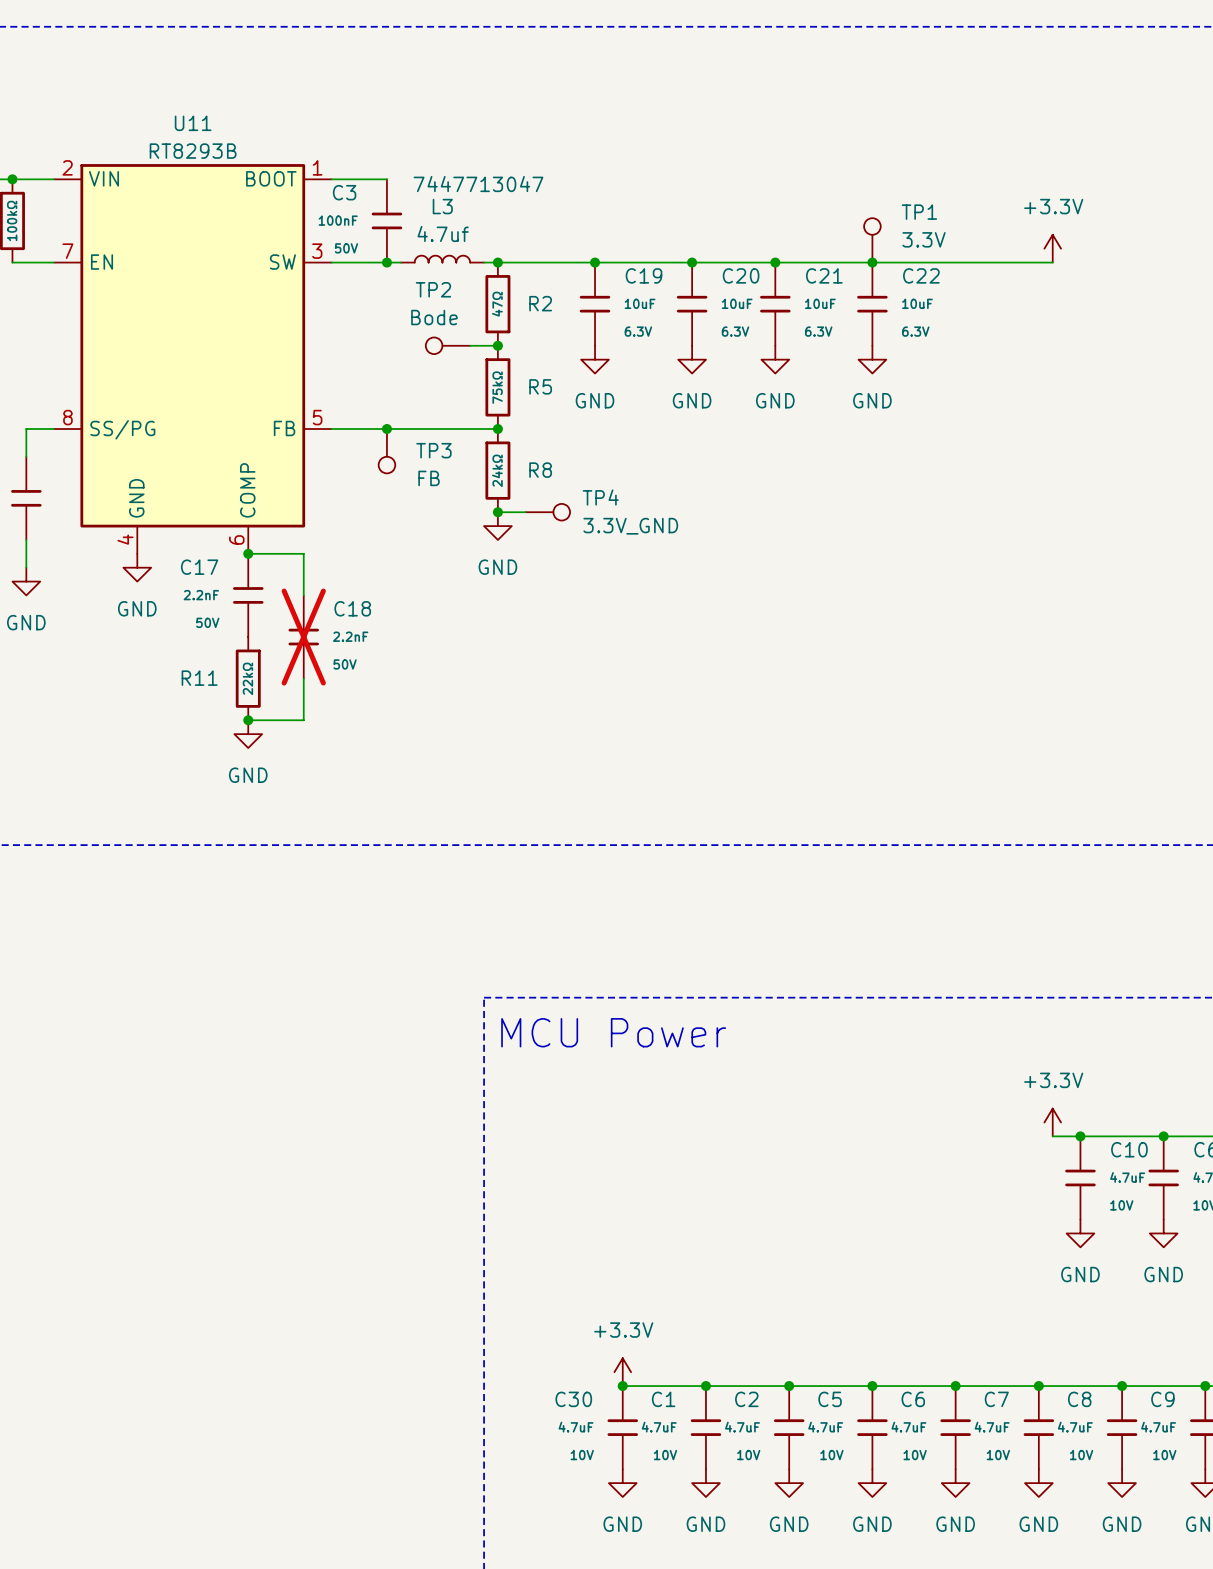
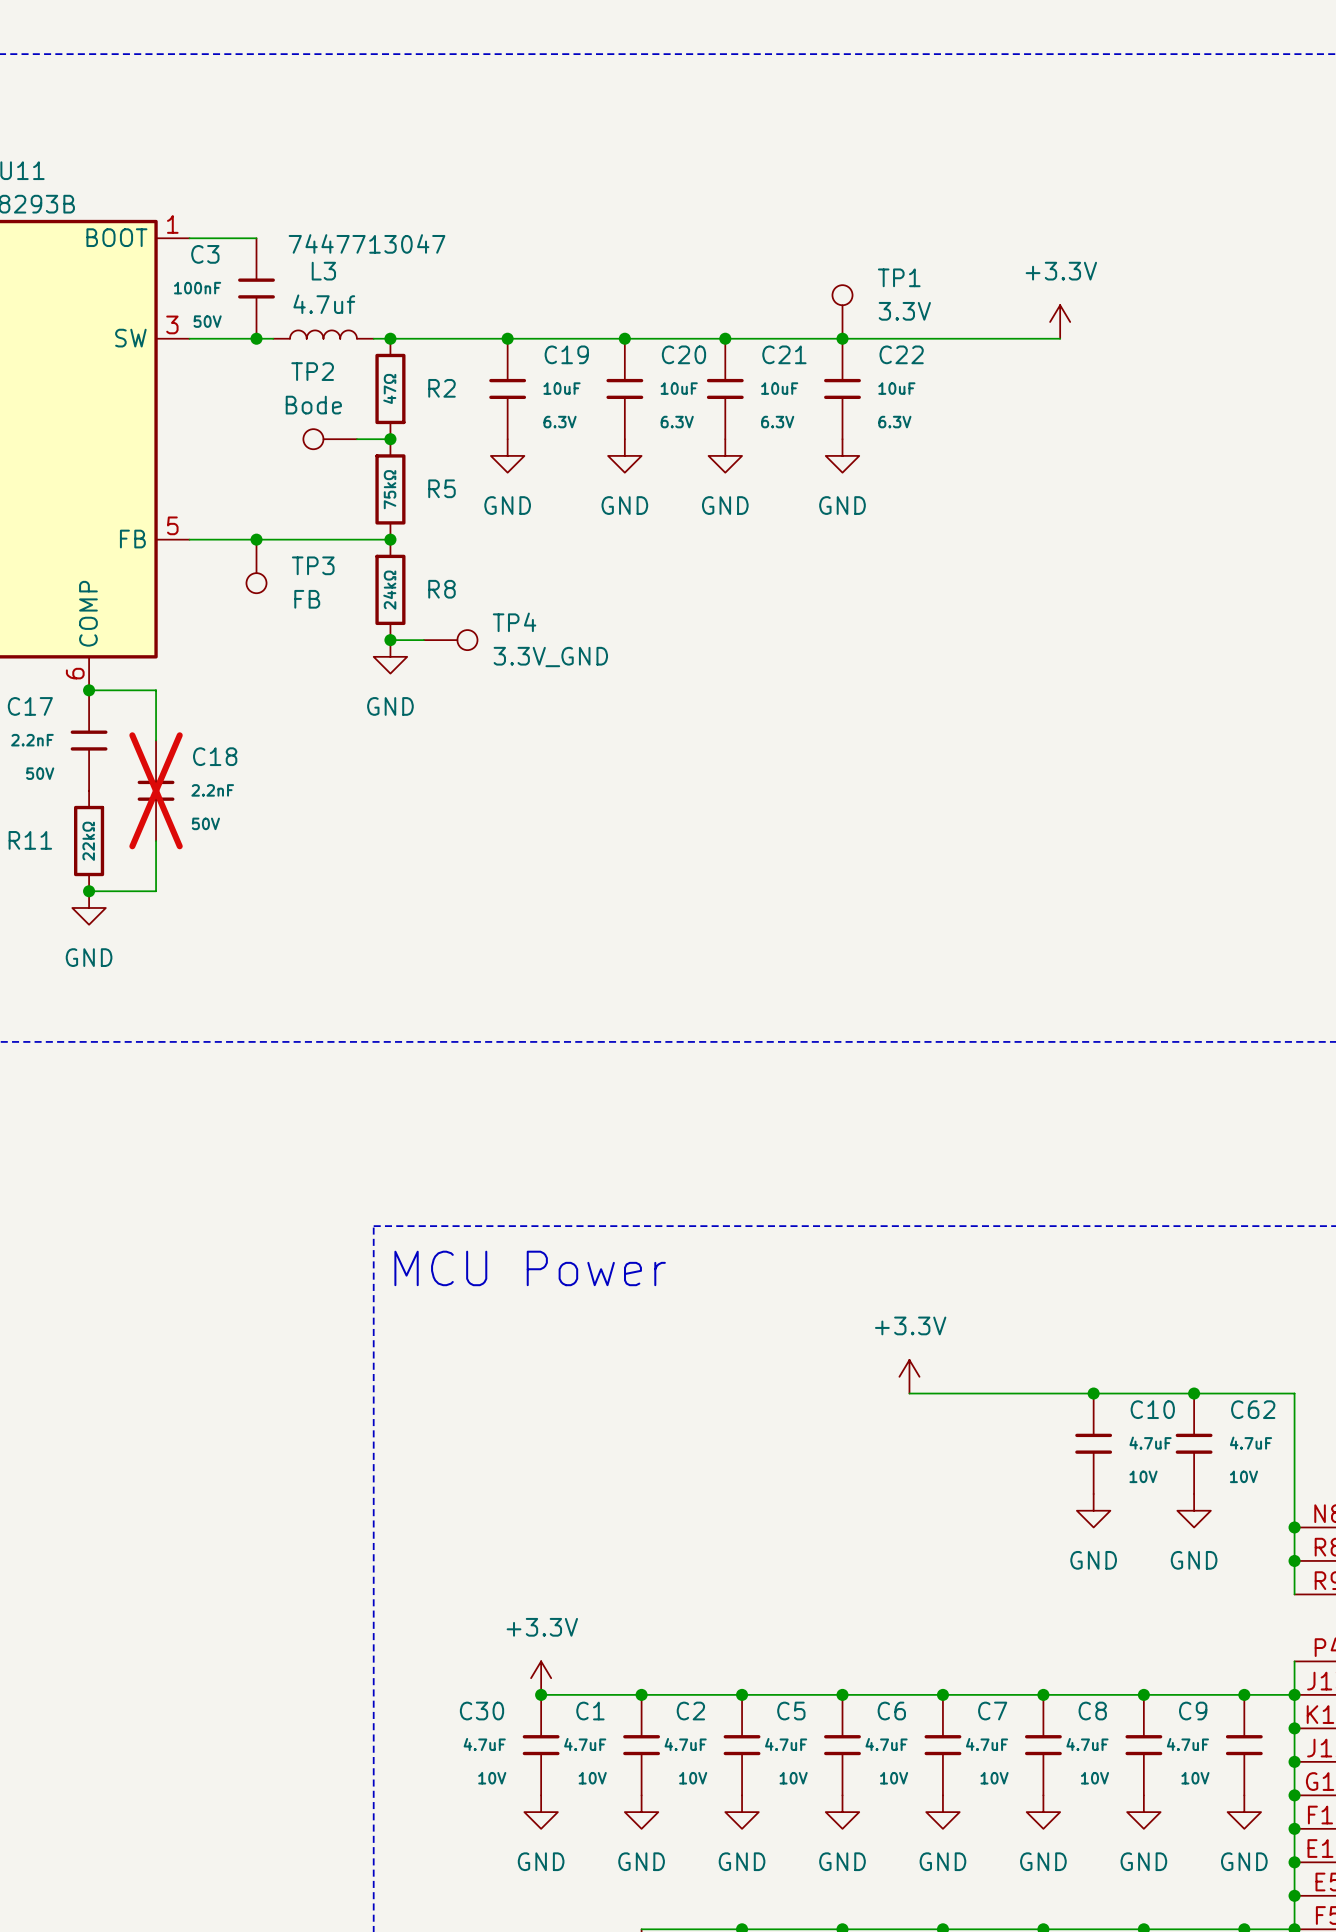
power symbol position: +3.3V (1052, 1122) -> +3.3V (909, 1376)
wire: none -> (909, 1393) (1060, 1393)

